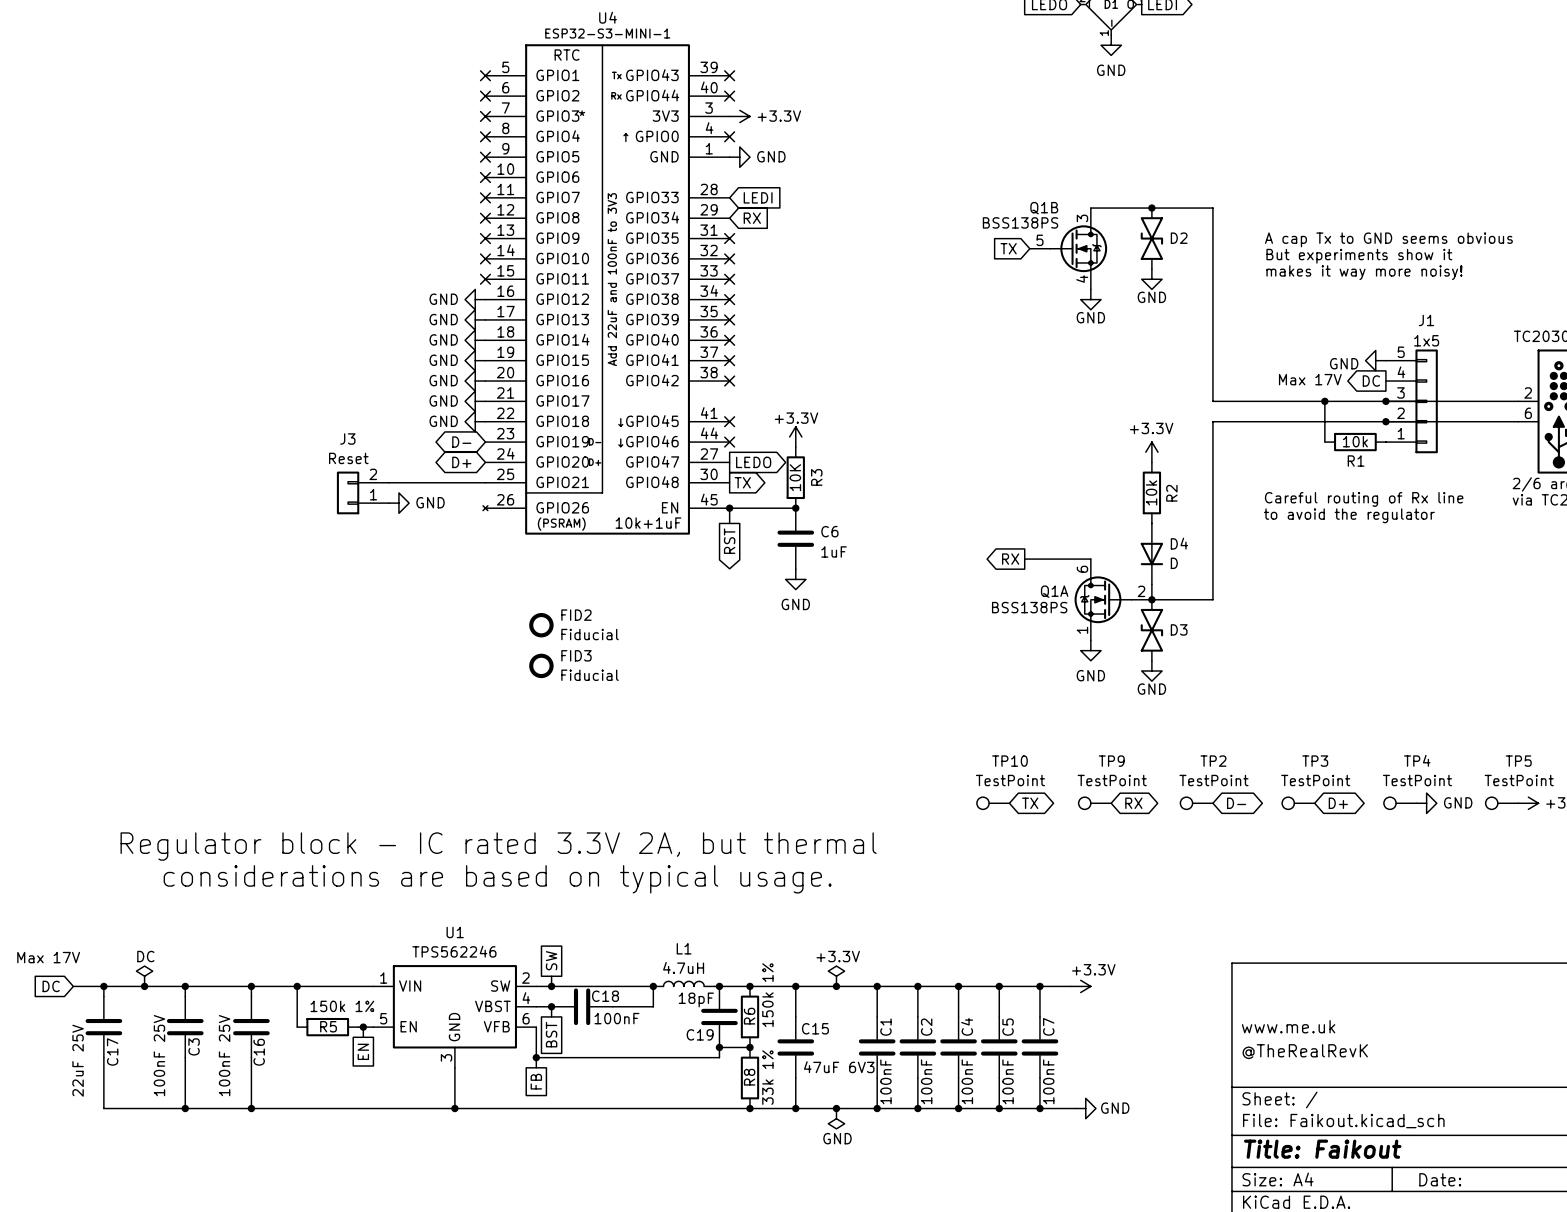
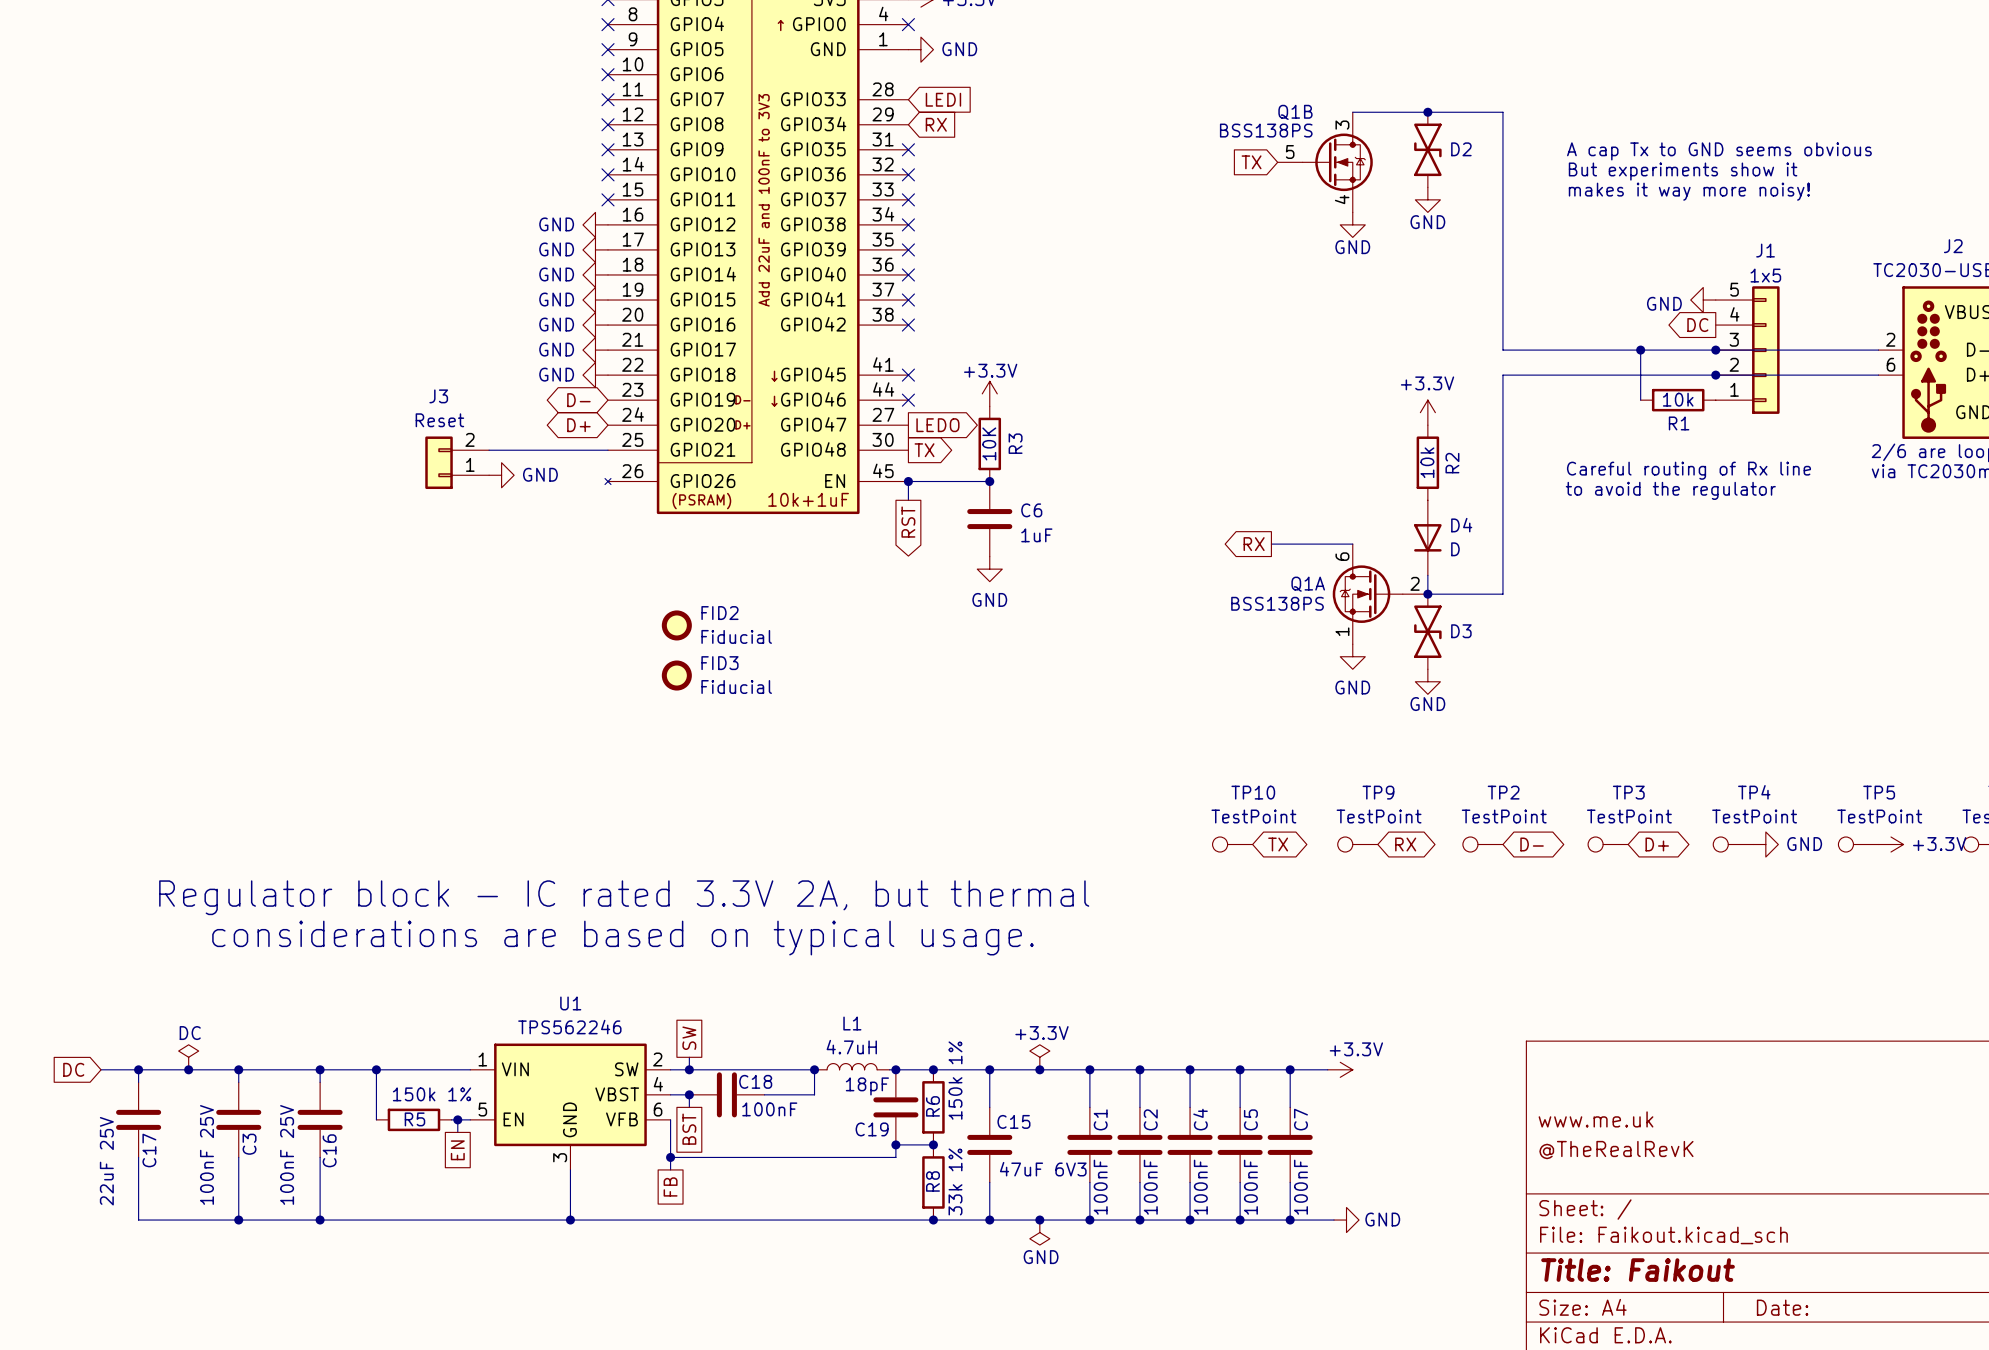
text: Max 17V (1310, 379) -> none
text: Max 17V (48, 957) -> none

